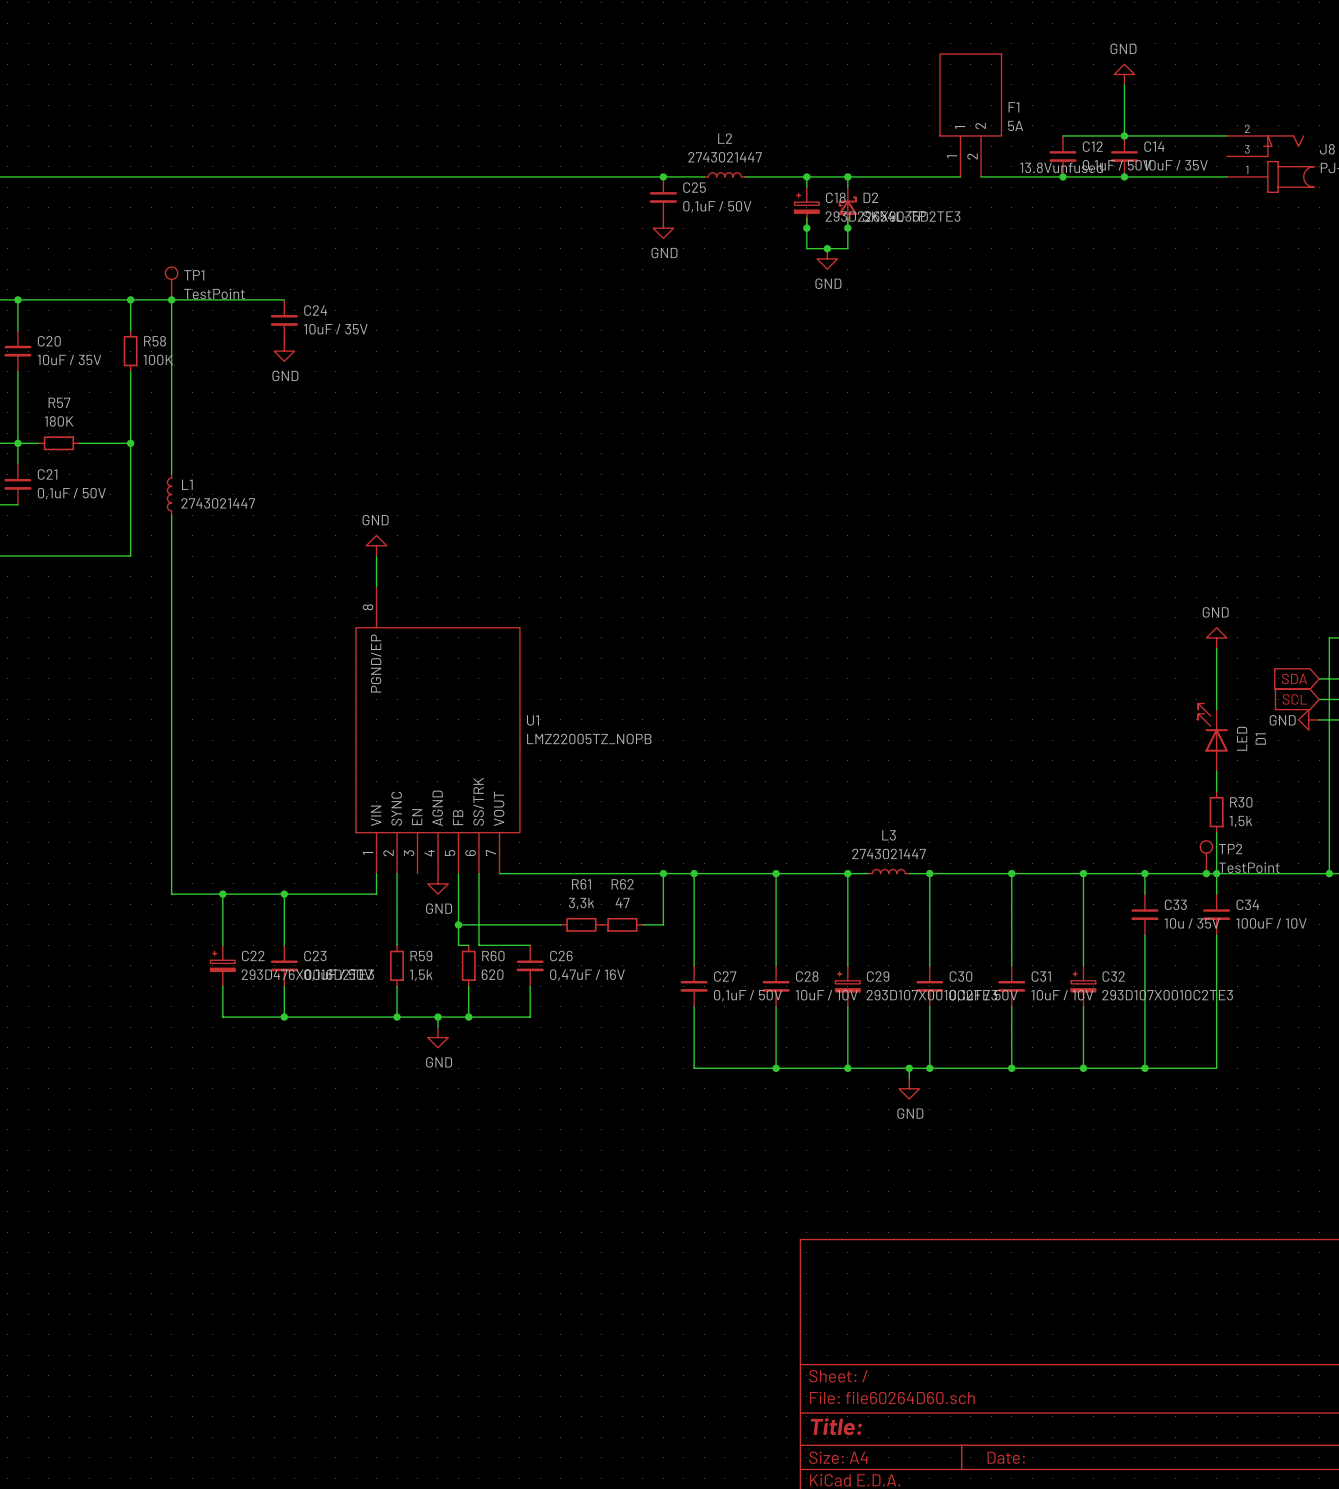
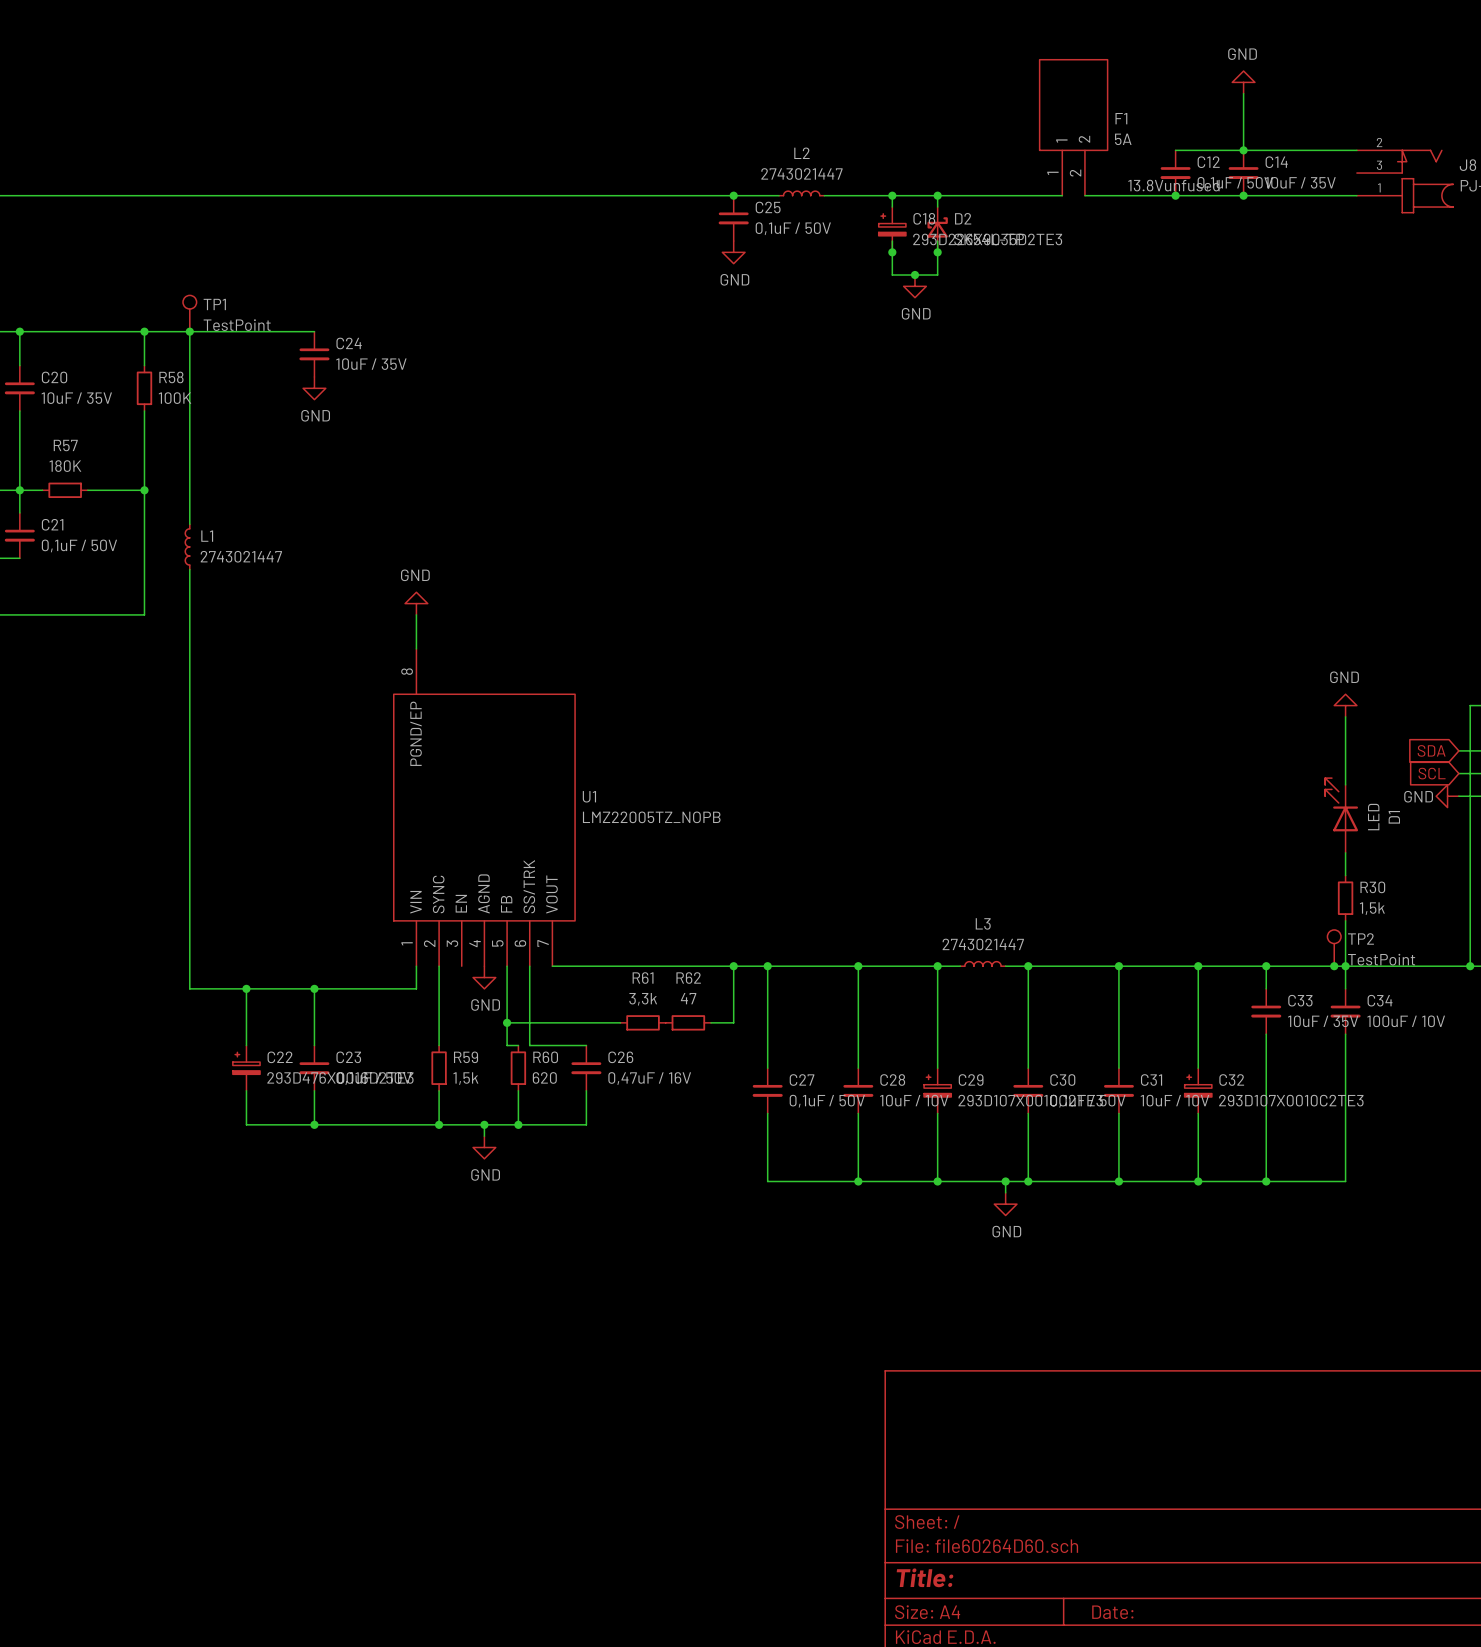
C33 value: 10u / 35V (1192, 923) -> 10uF / 35V (1323, 1021)

